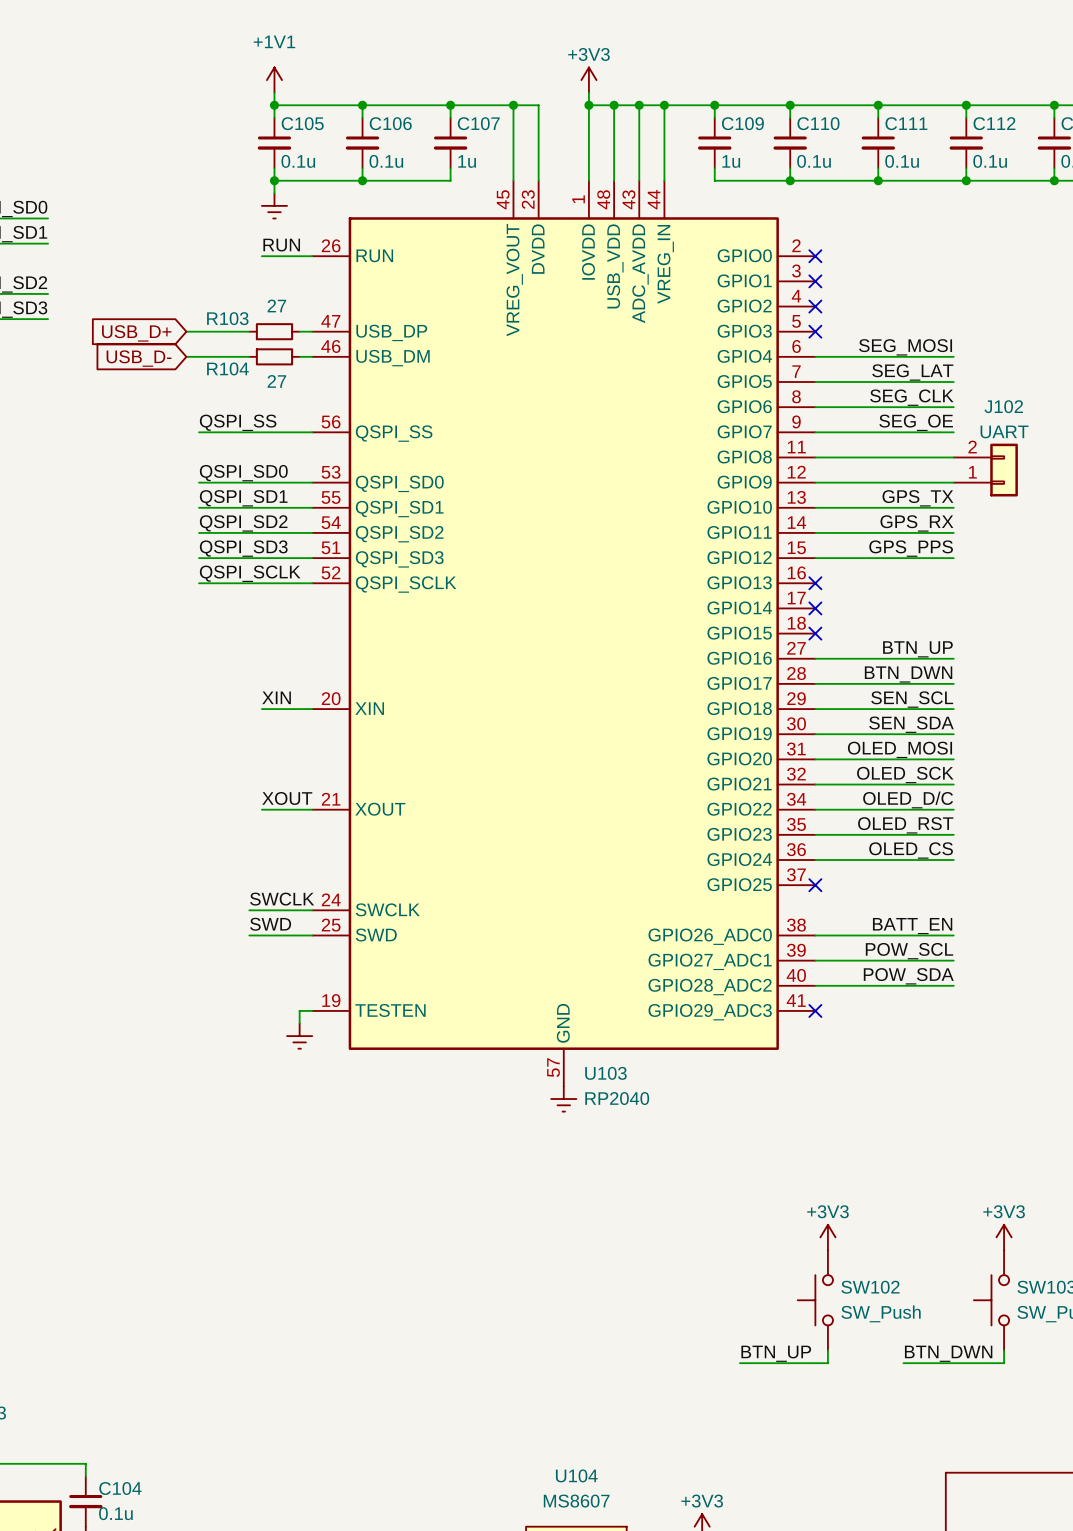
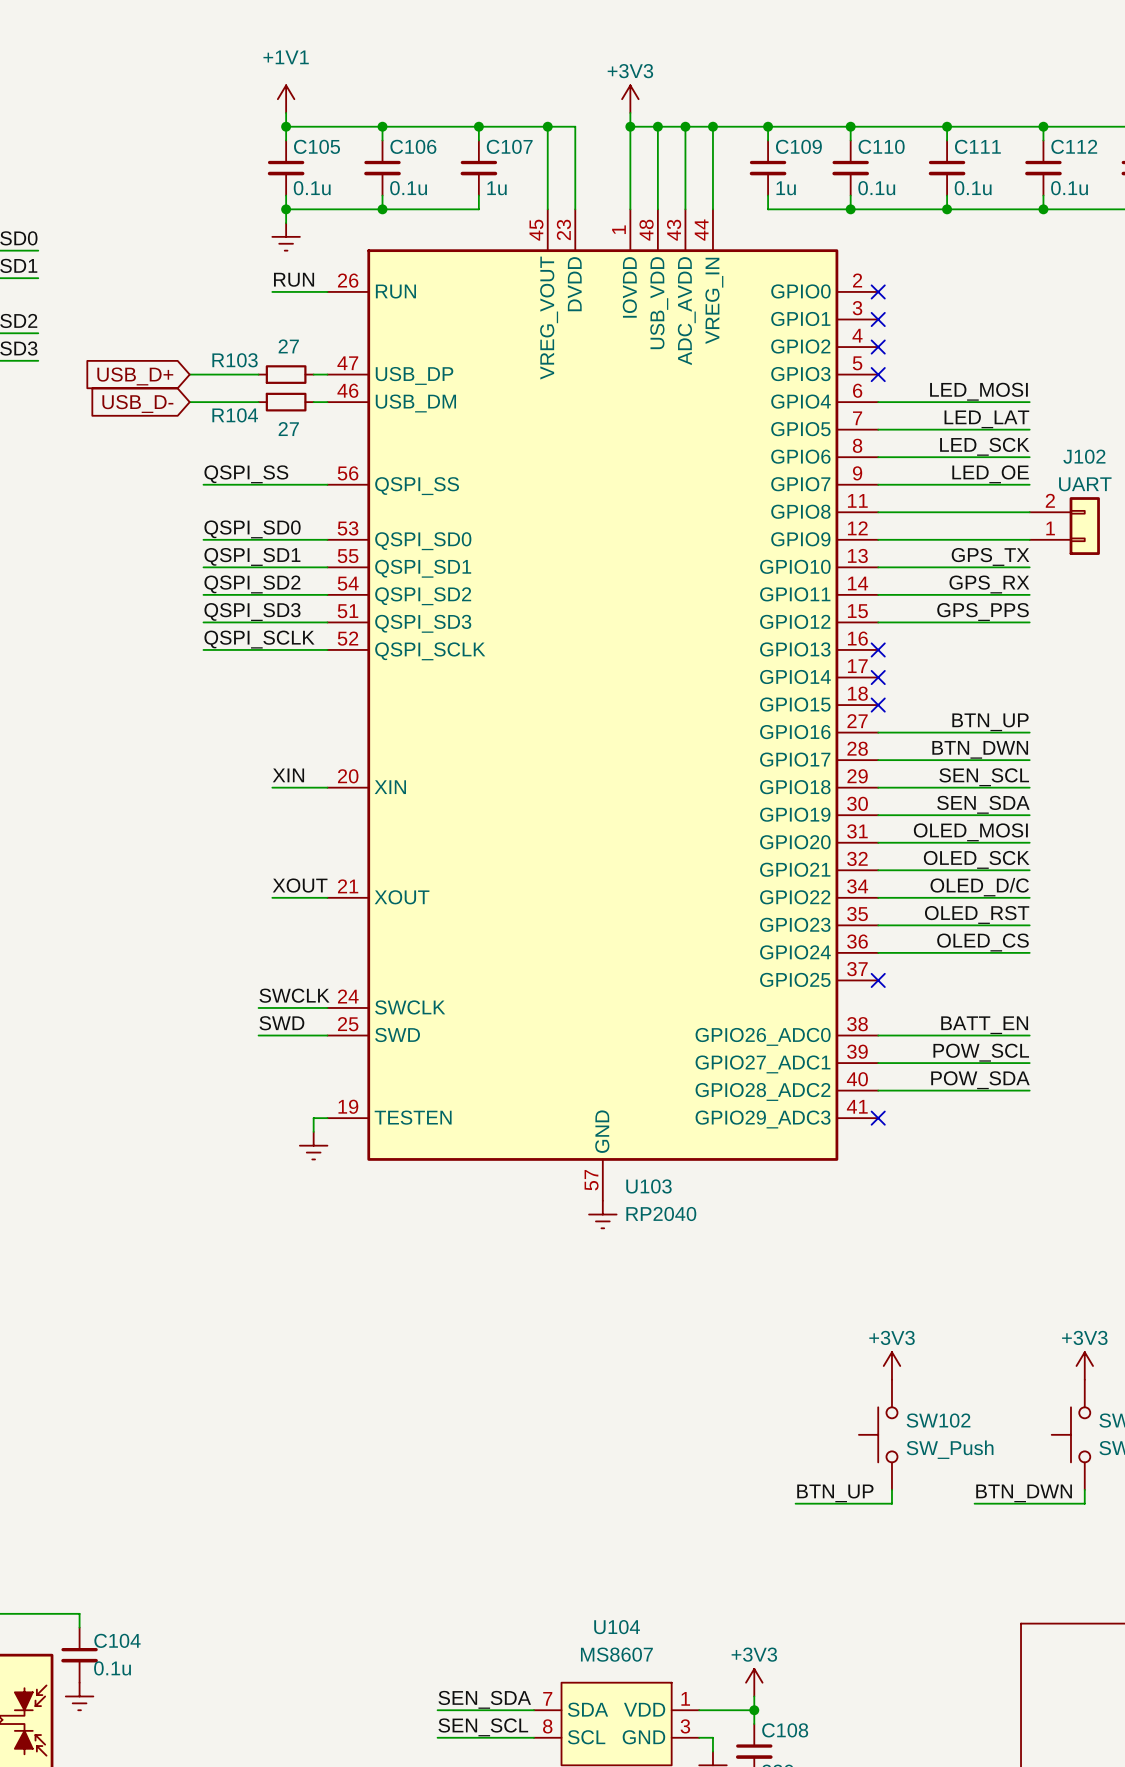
label: SEG_MOSI (905, 347) -> LED_MOSI (978, 391)
label: SEG_LAT (912, 372) -> LED_LAT (986, 419)
label: SEG_CLK (911, 397) -> LED_SCK (984, 446)
label: SEG_OE (916, 422) -> LED_OE (990, 474)

